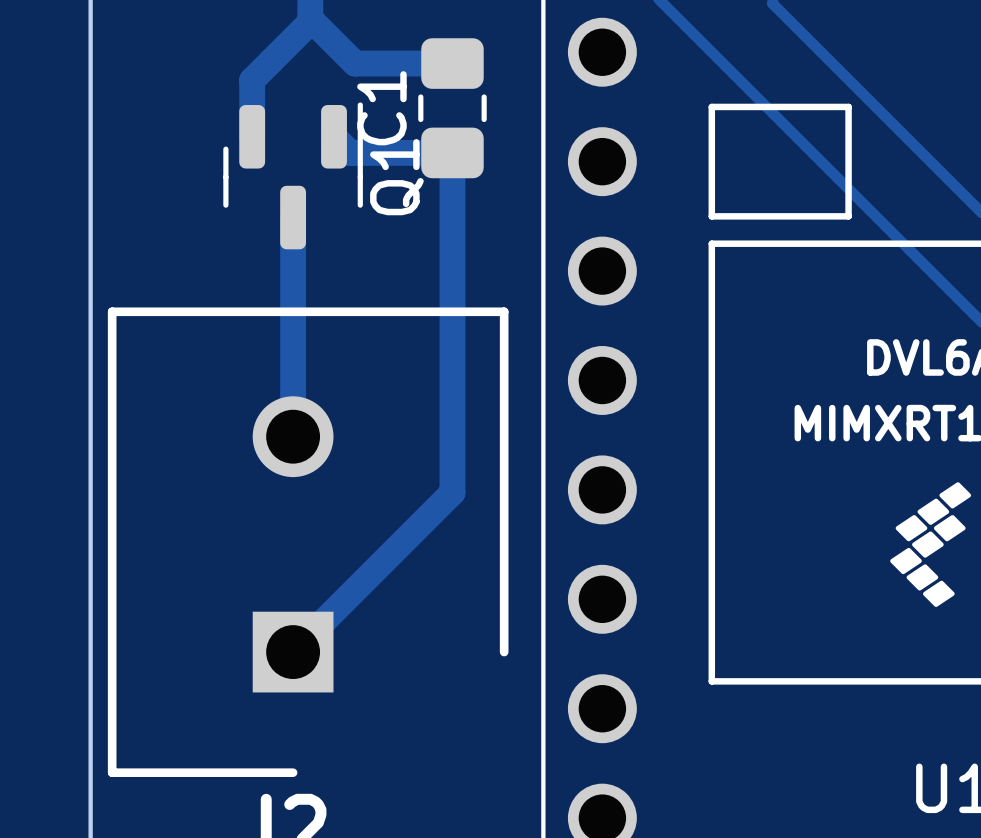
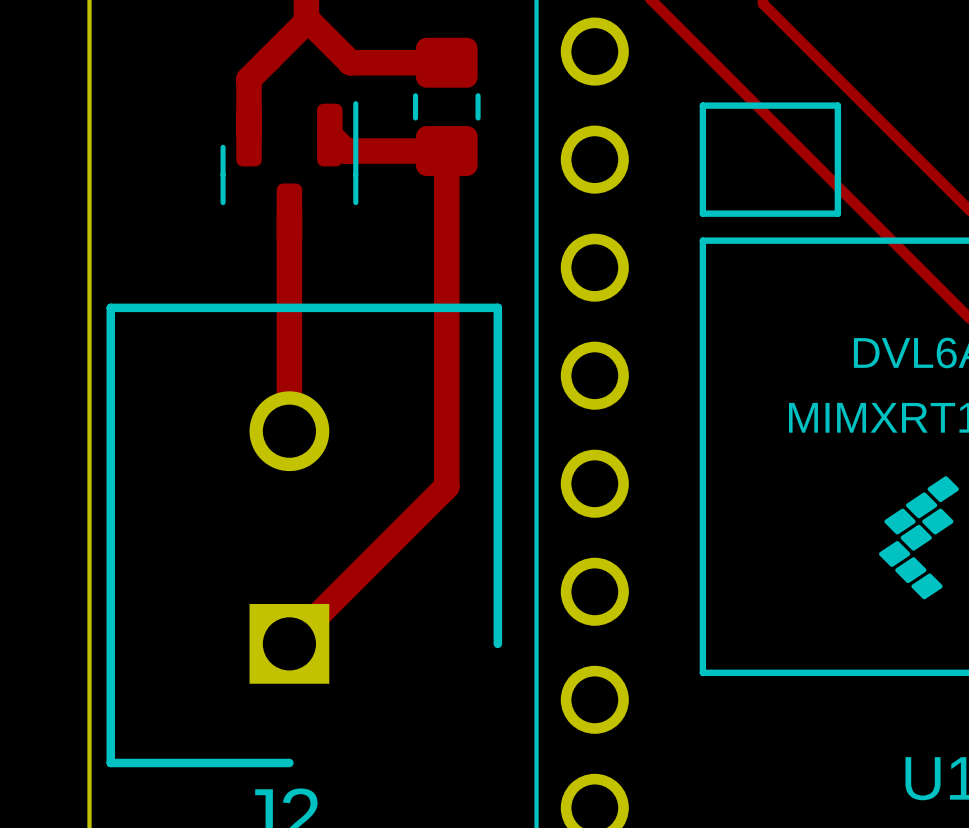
C1 name: C1 (381, 108) -> none
Q1 name: Q1 (396, 177) -> none

